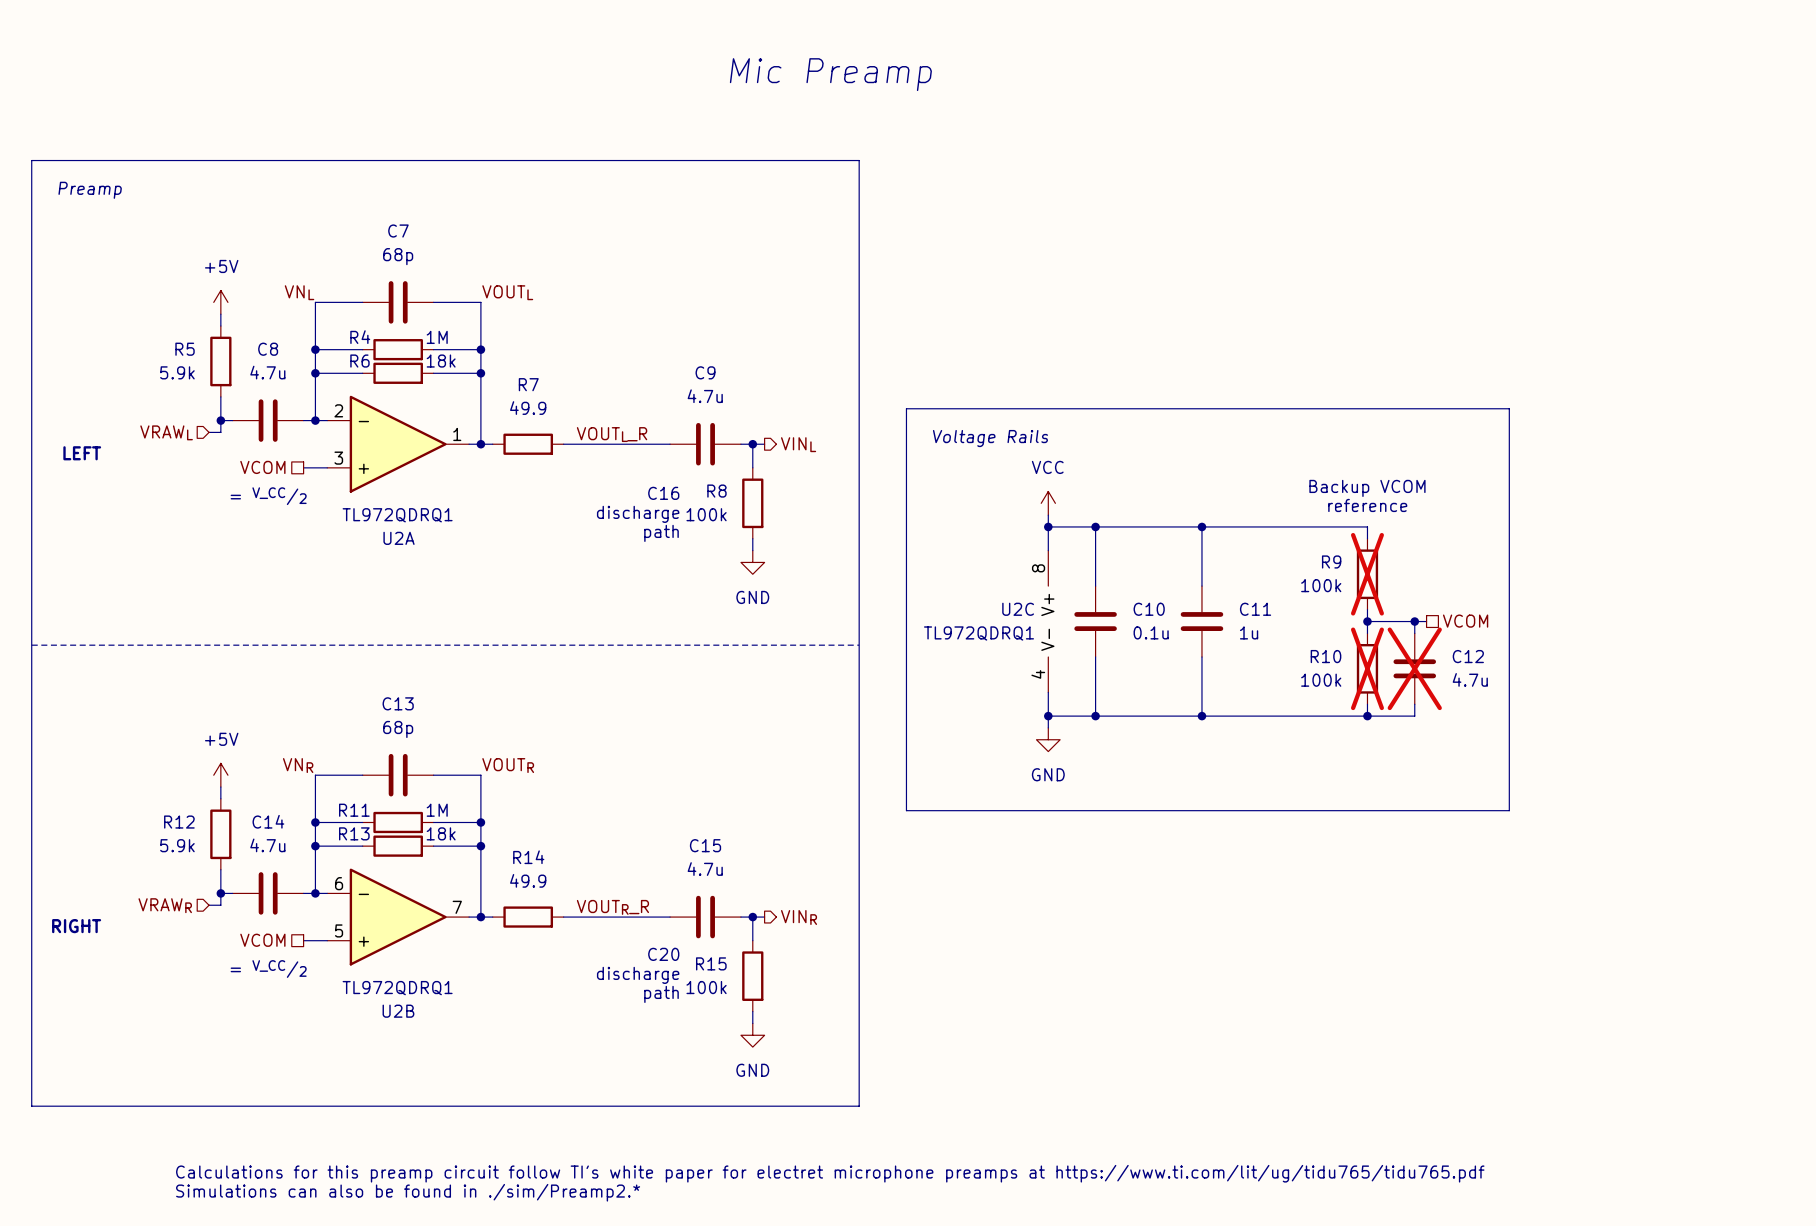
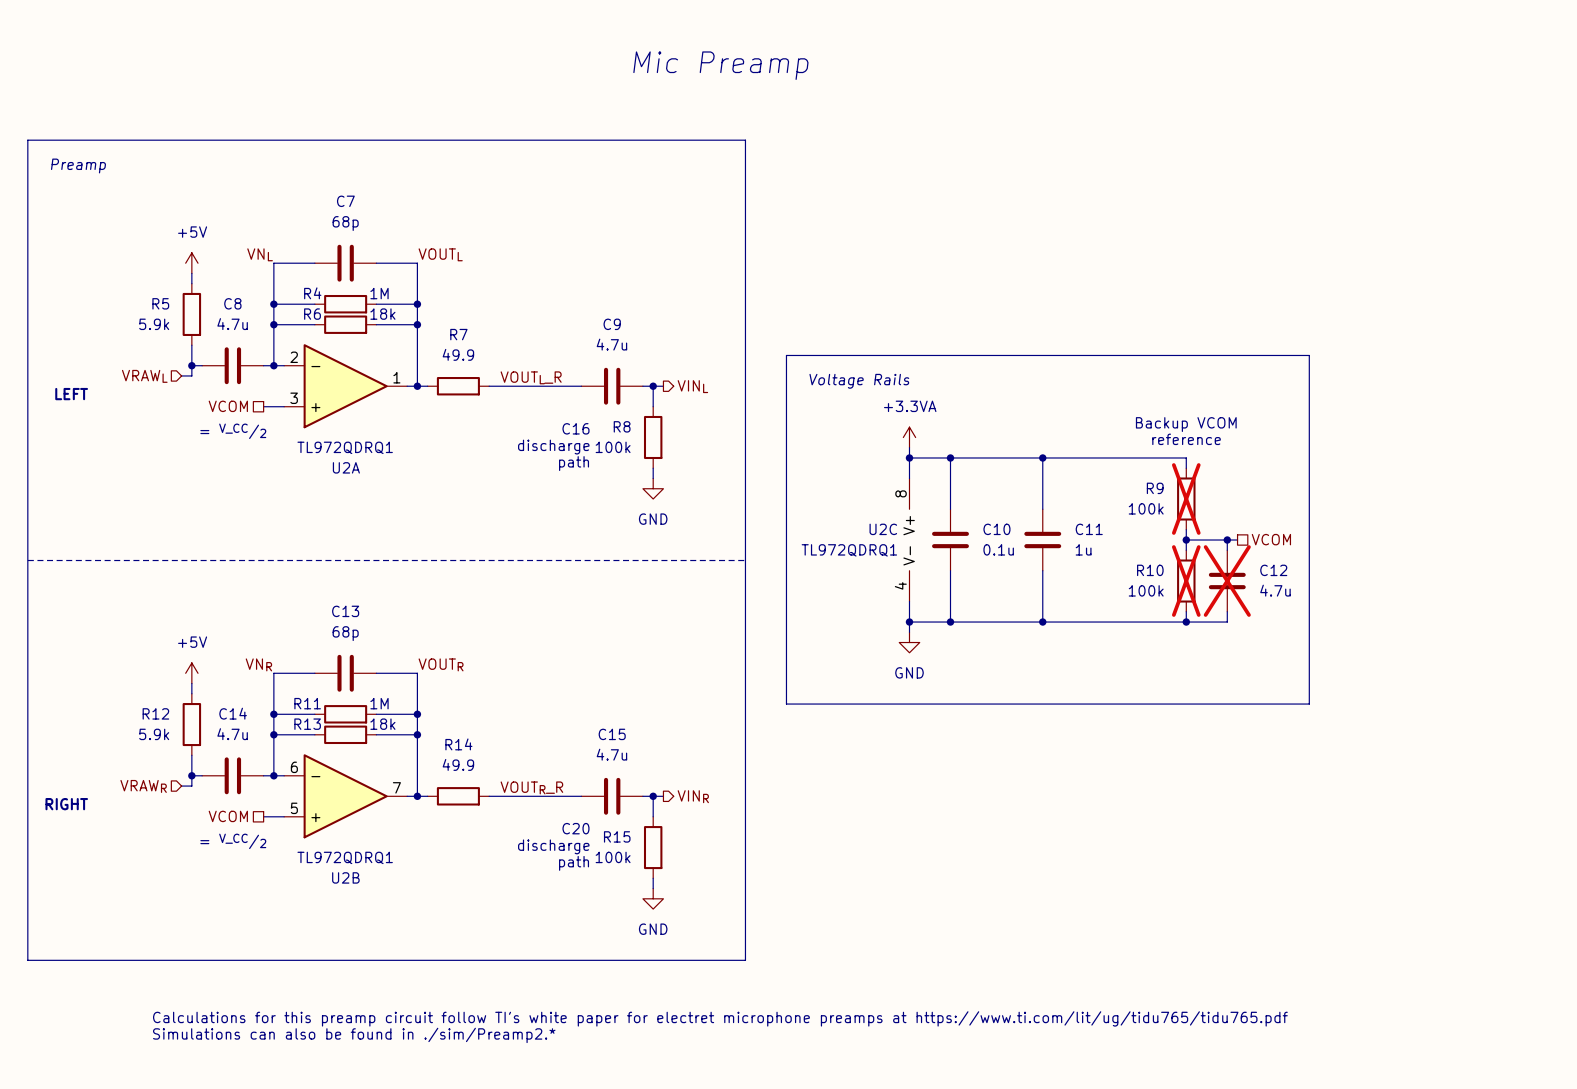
power symbol: VCC (1048, 503) -> +3.3VA (909, 437)

